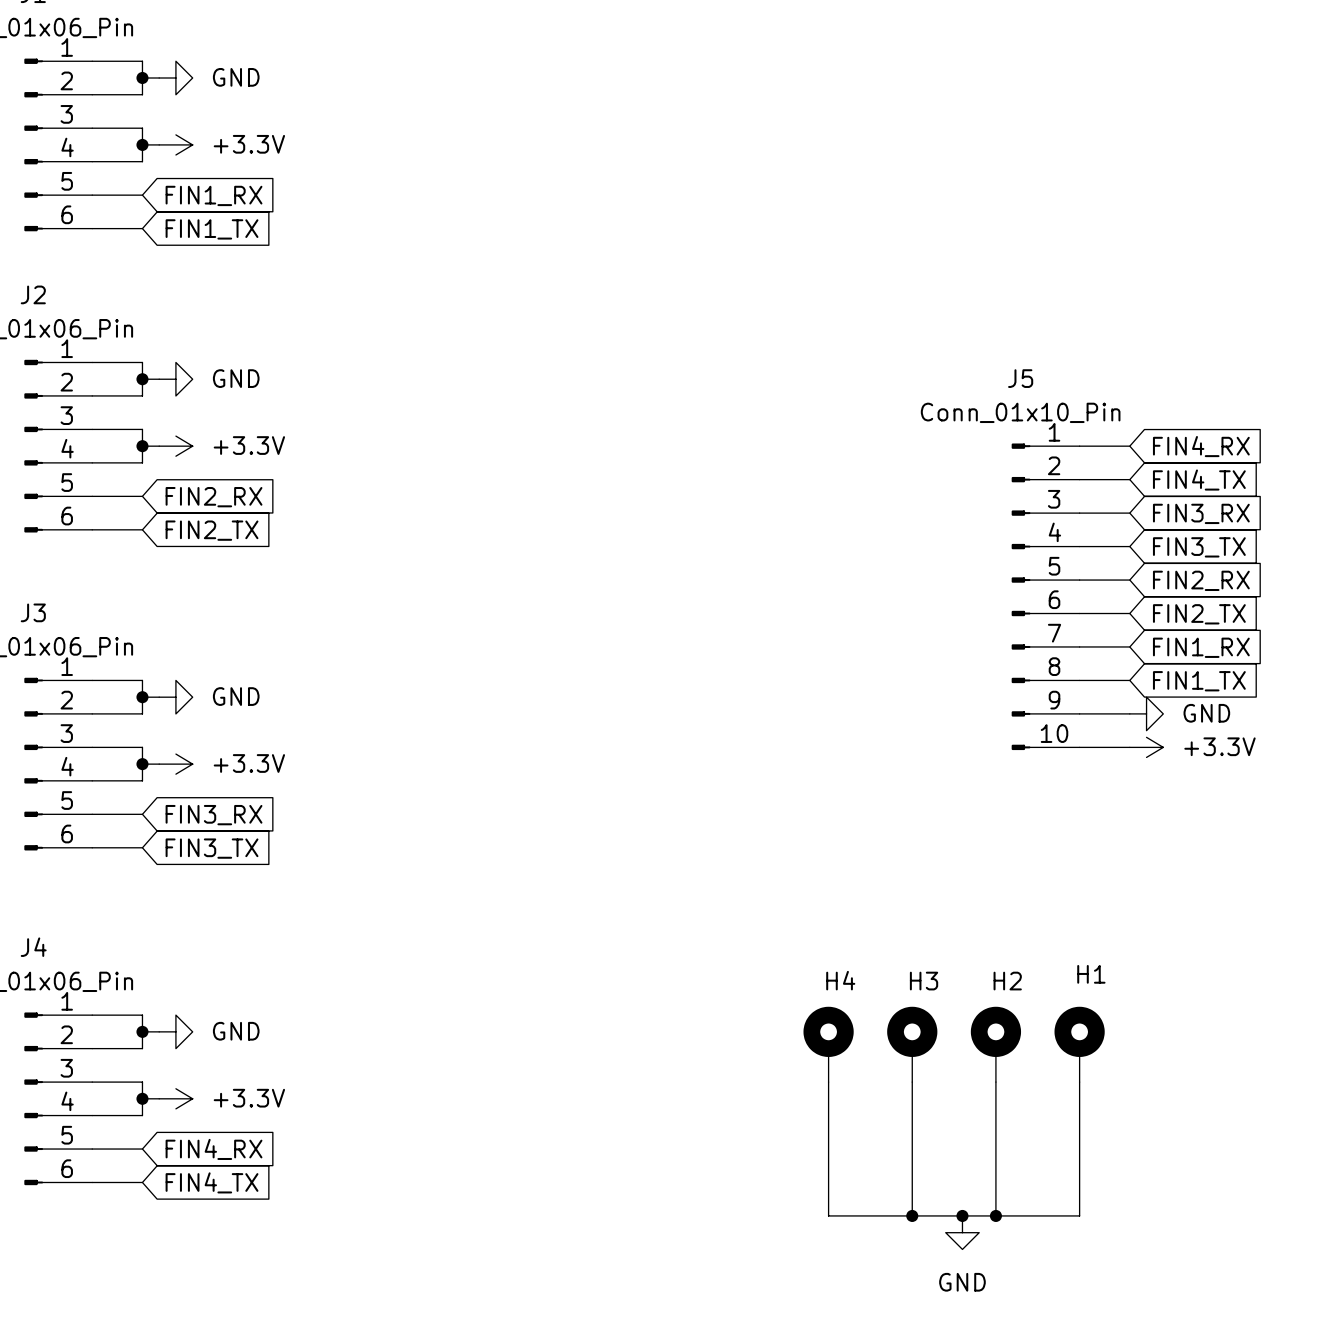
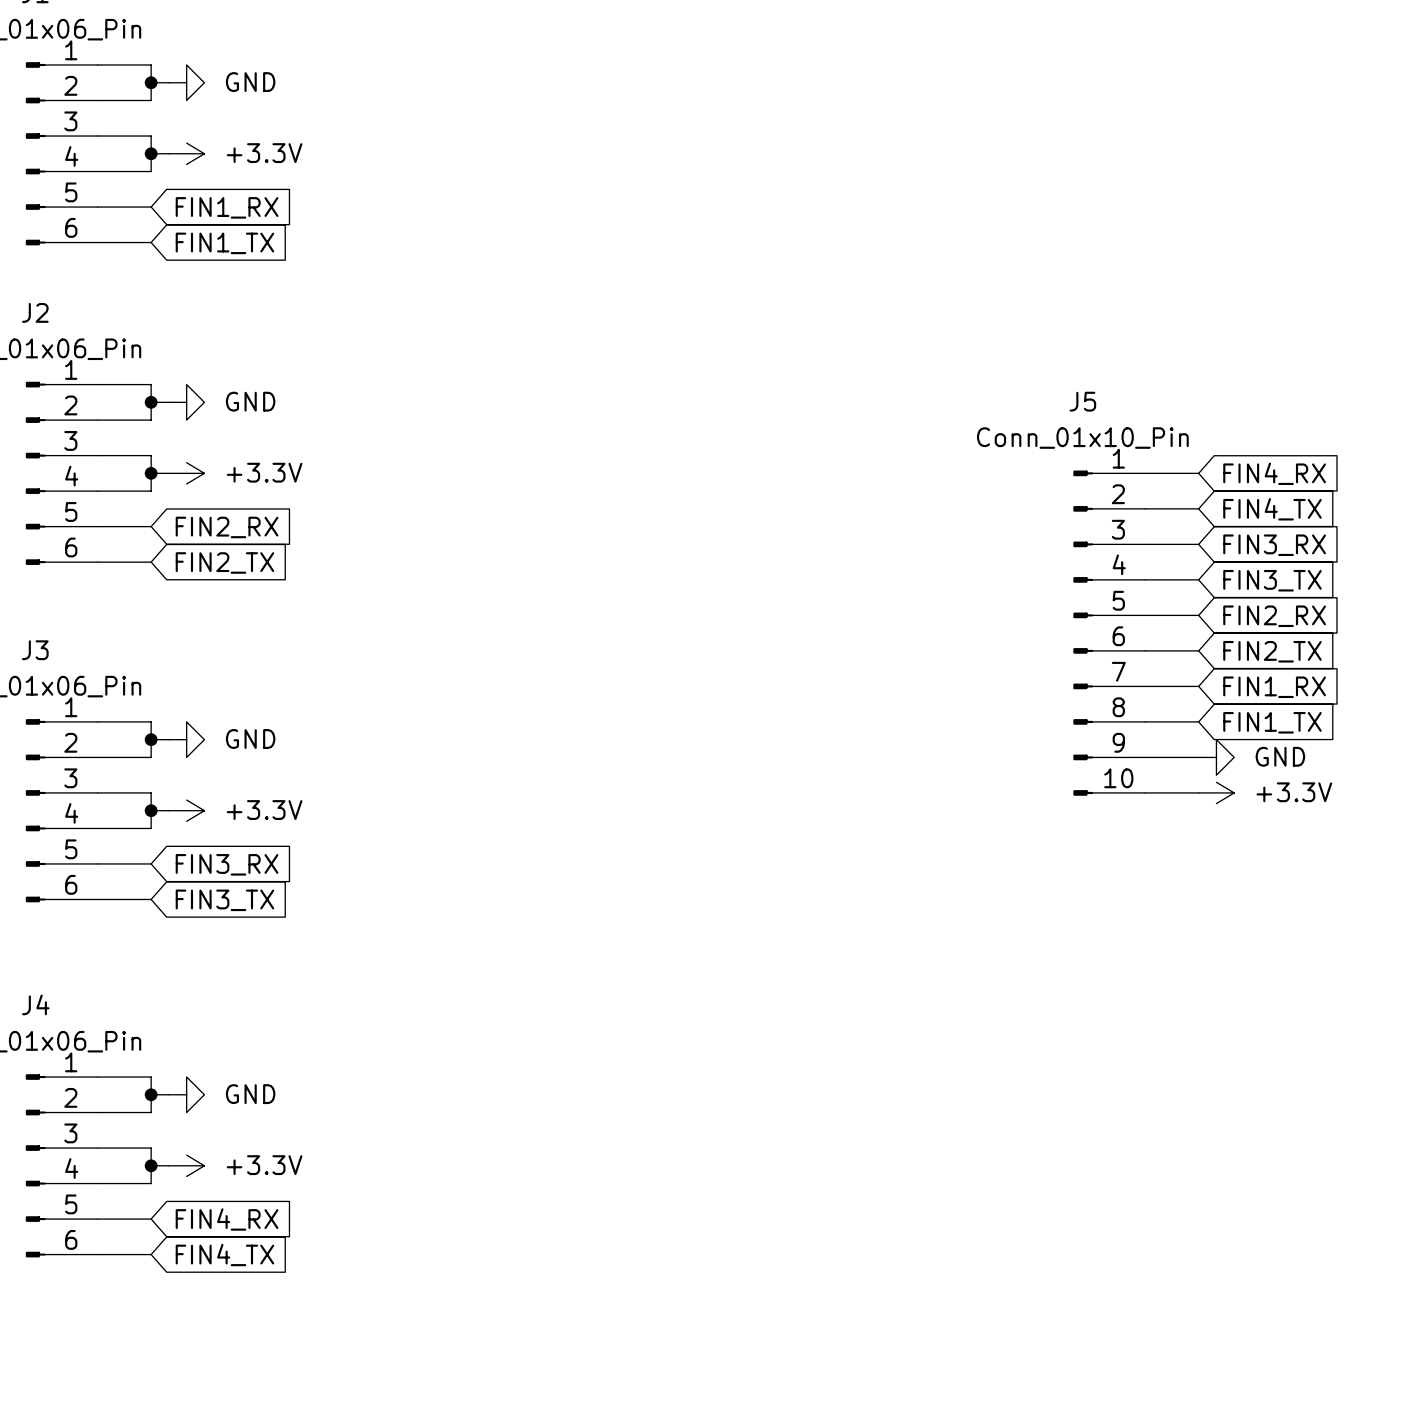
H4: (828, 1044) -> none
H3: (912, 1044) -> none
H2: (995, 1044) -> none
H1: (1079, 1044) -> none
wire: (828, 1082) (828, 1215) (1079, 1215) (1079, 1082) -> none
wire: (912, 1082) (912, 1215) -> none
wire: (995, 1082) (995, 1215) -> none
junction: (912, 1215) -> none
junction: (962, 1215) -> none
junction: (995, 1215) -> none
power symbol: GND (962, 1232) -> none

